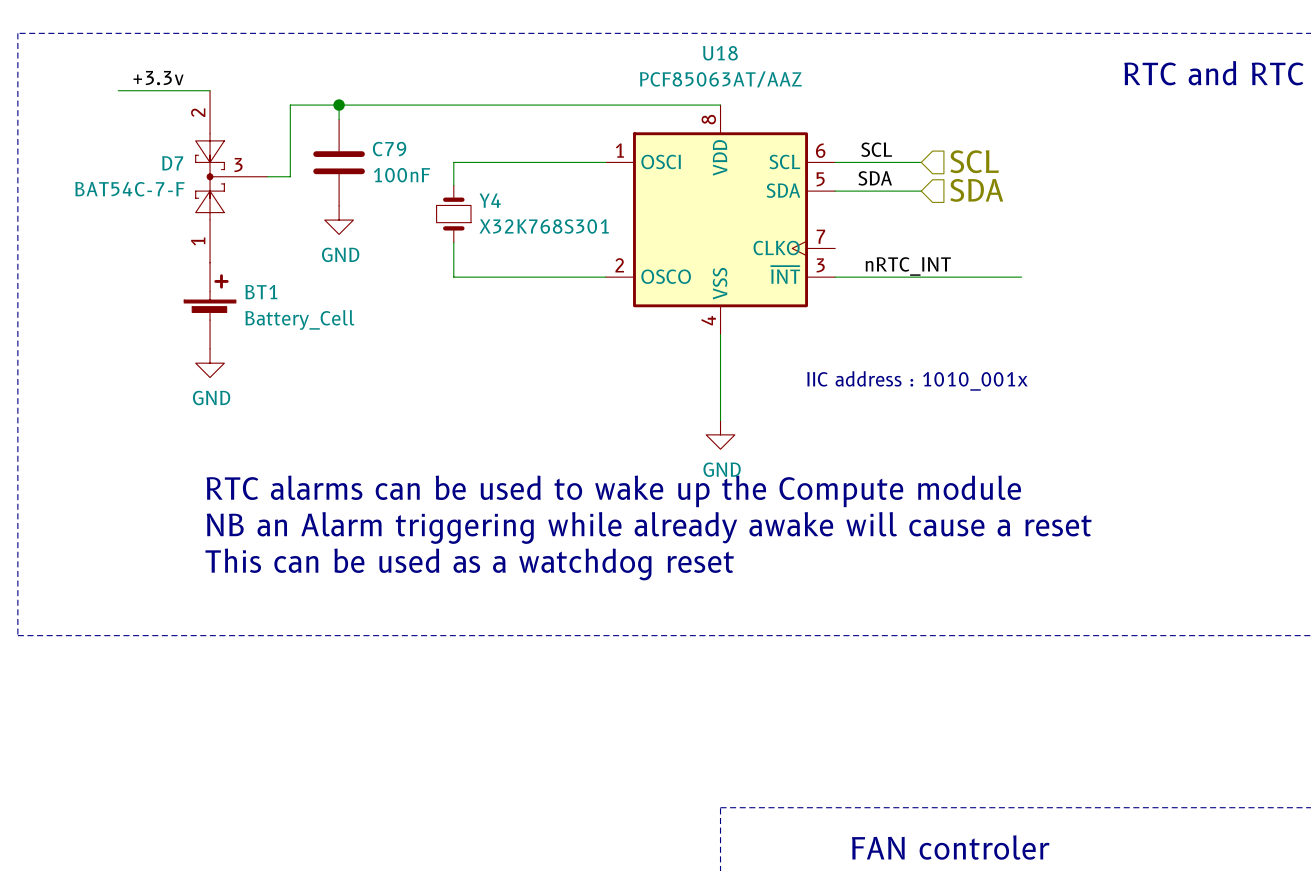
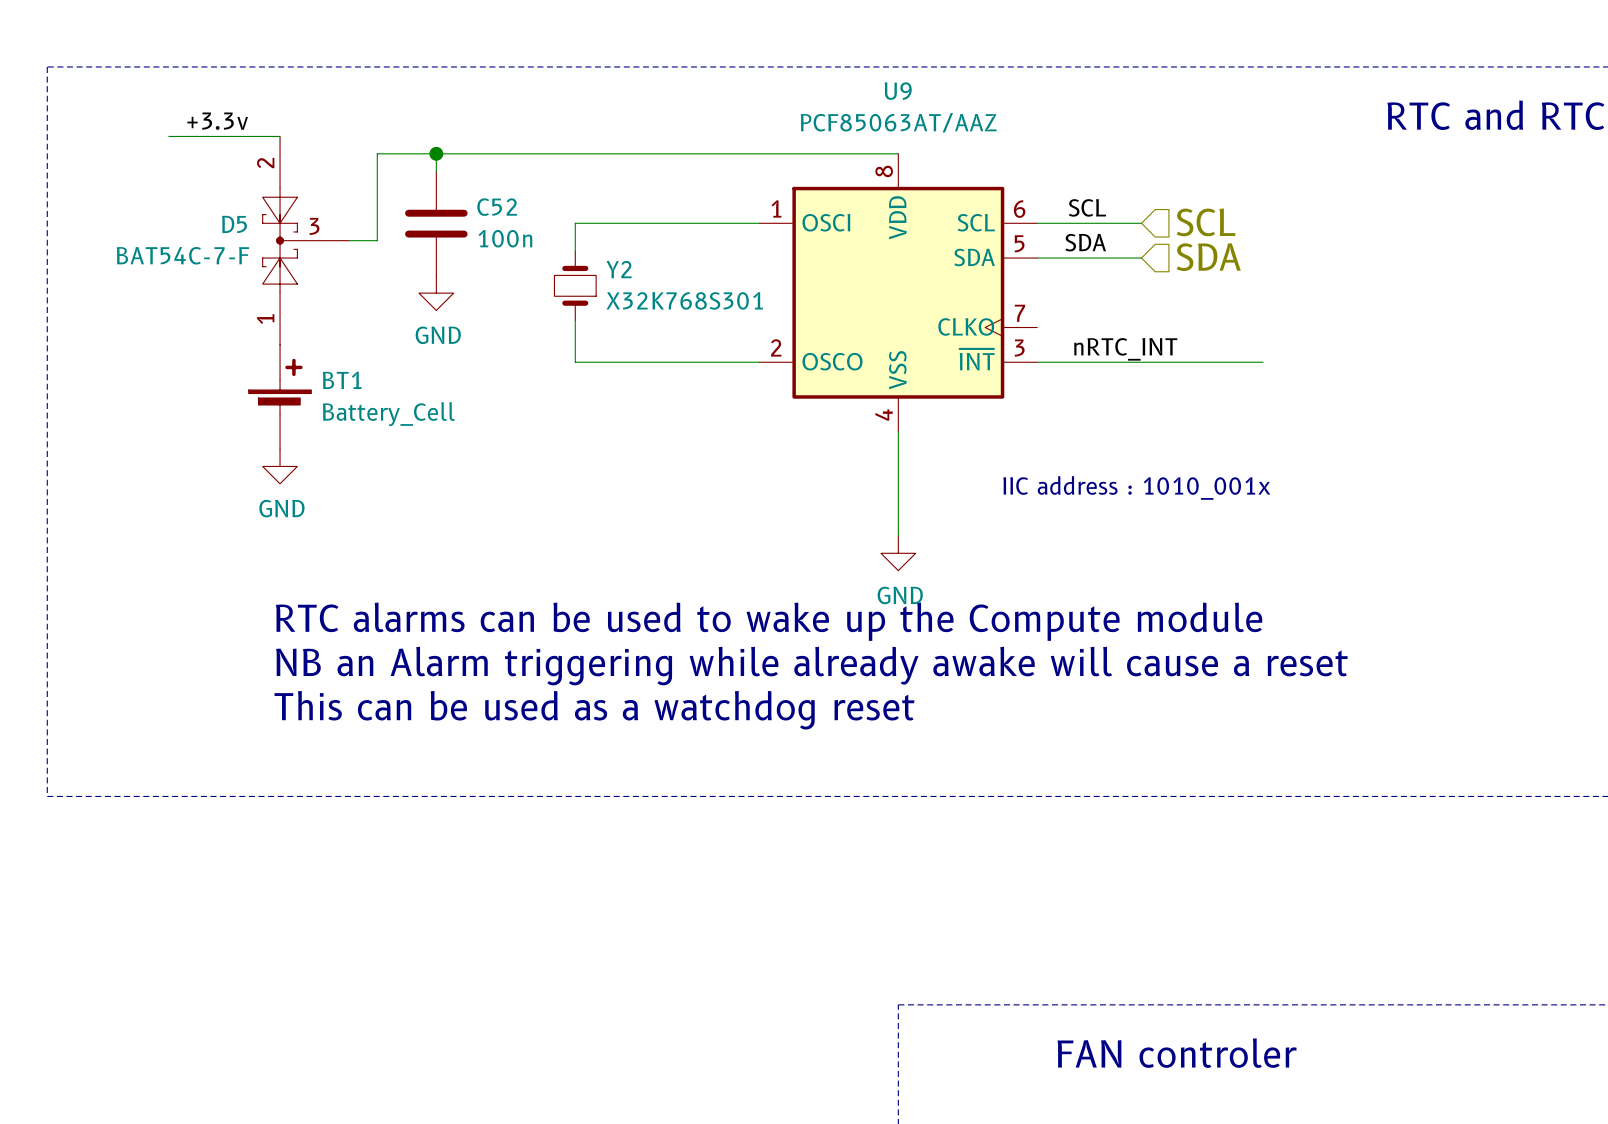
U18 name: U18 (720, 53) -> U9 (898, 91)
C79 name: C79 (389, 149) -> C52 (497, 207)
D7 name: D7 (172, 163) -> D5 (234, 224)
C79 value: 100nF (401, 175) -> 100n (505, 238)
Y4 name: Y4 (490, 200) -> Y2 (619, 269)

